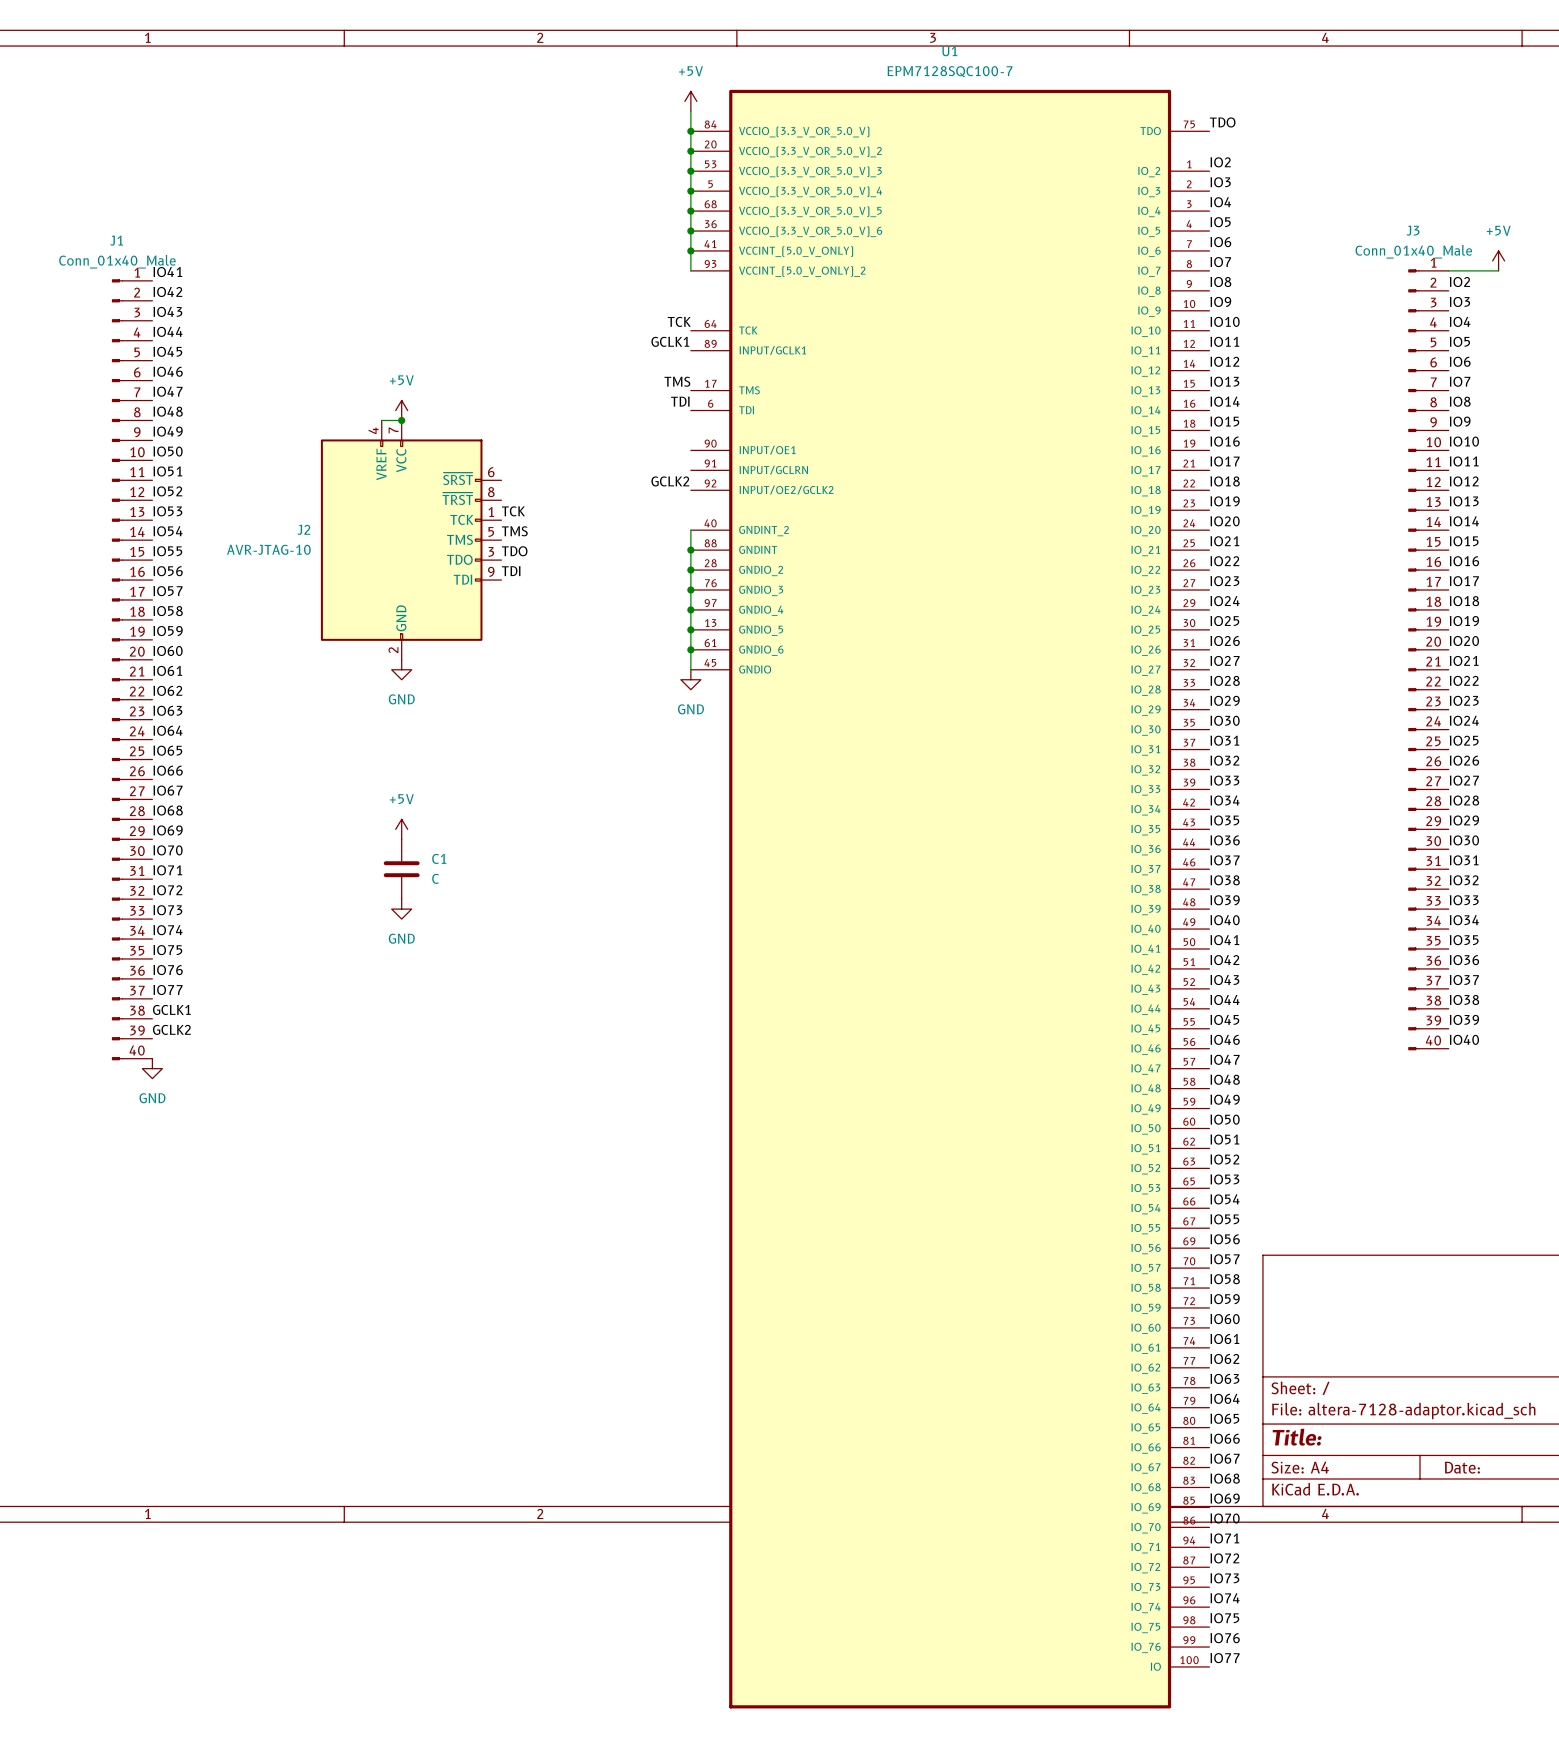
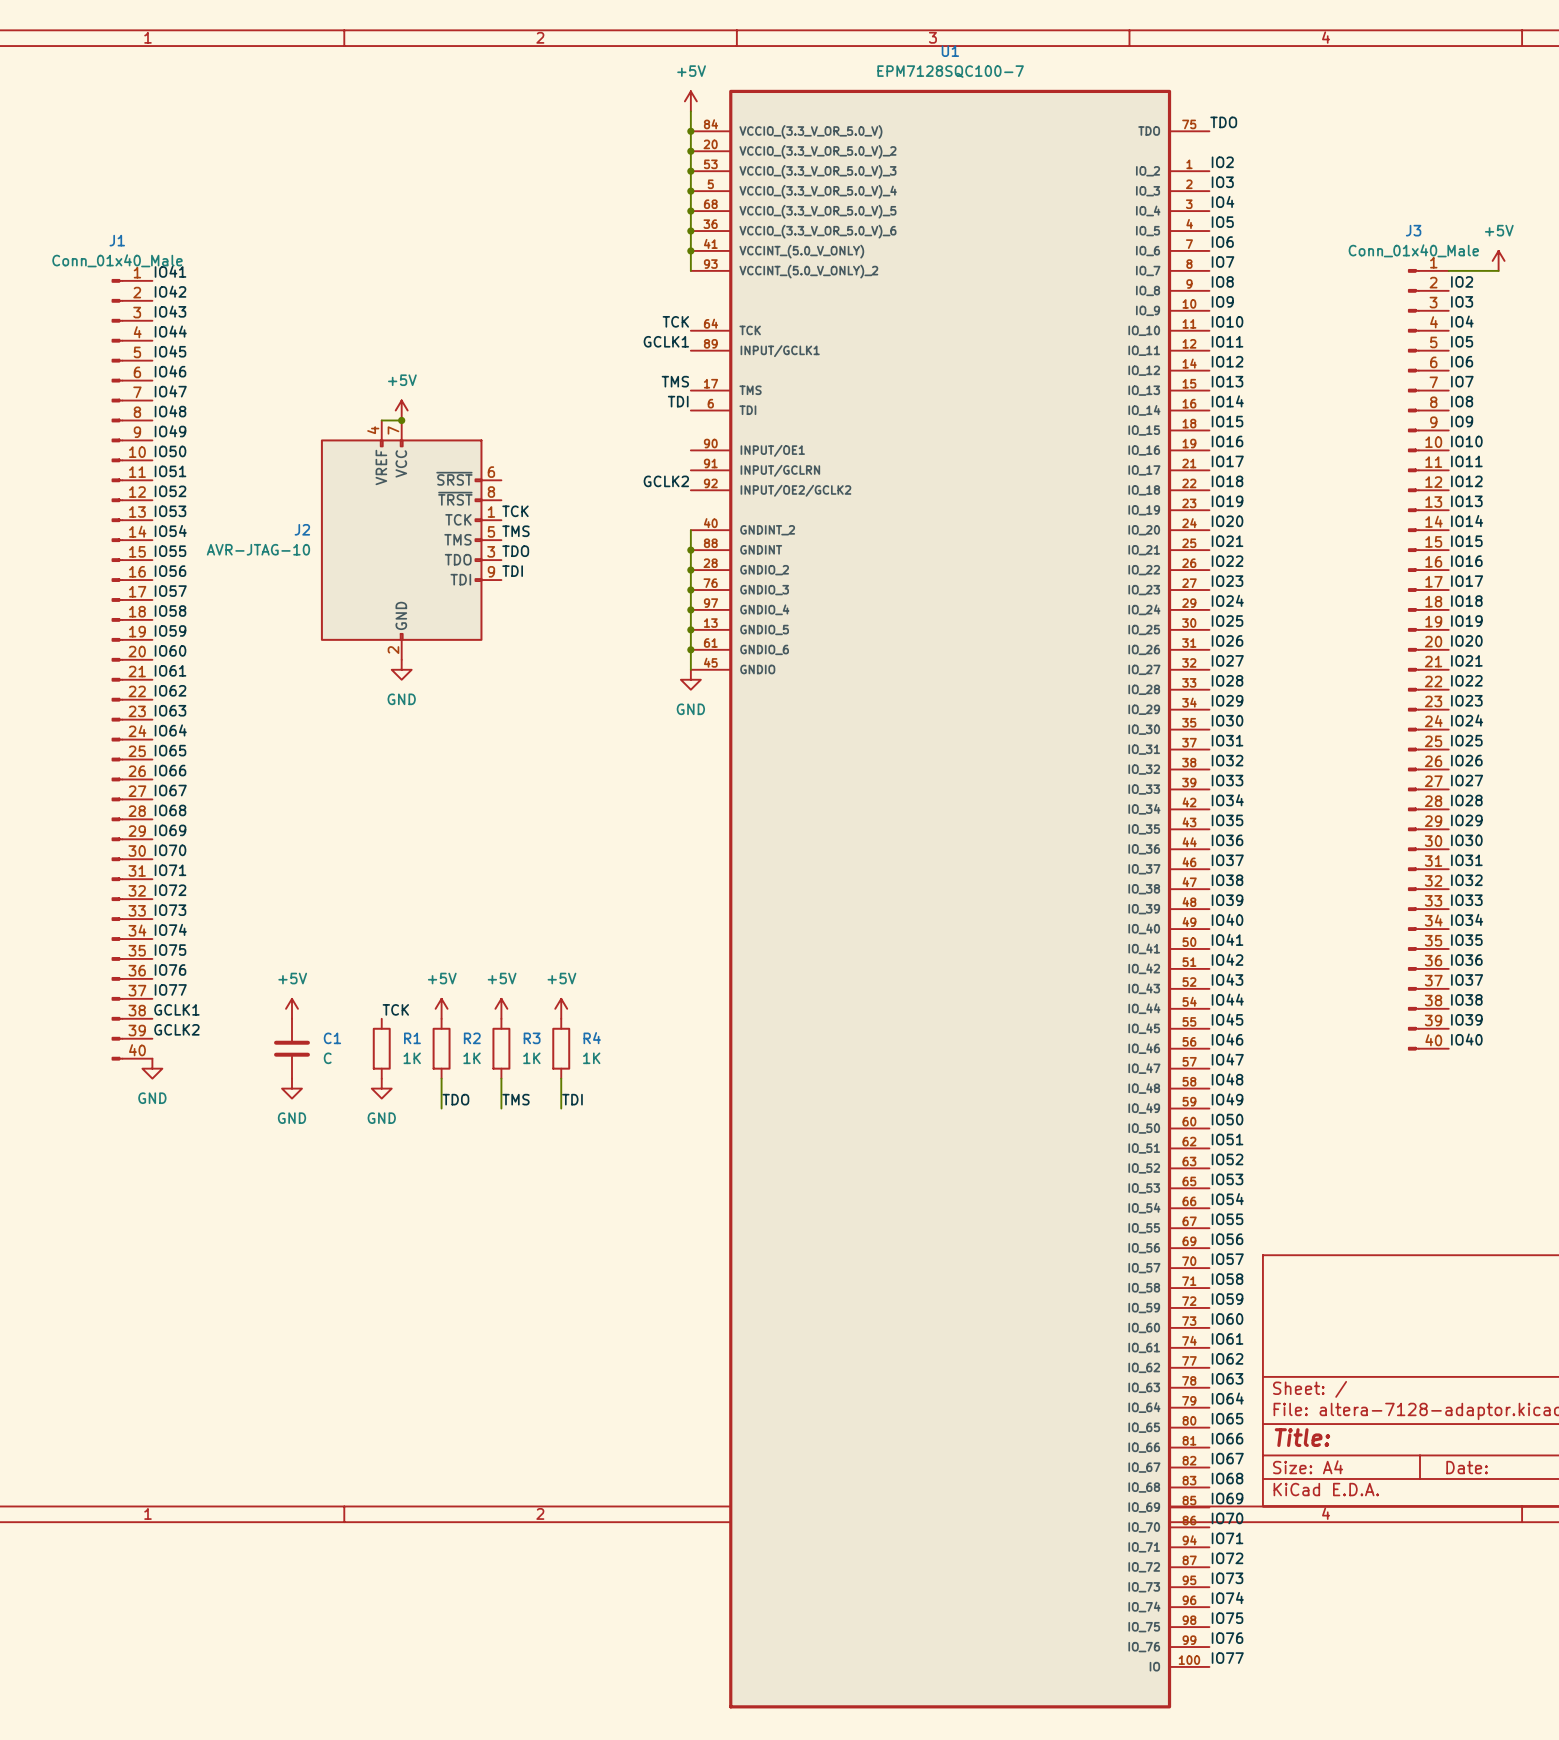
power symbol: +5V (401, 829) -> none
C1 position: (401, 869) -> (291, 1048)
power symbol: GND (401, 909) -> none
power symbol: none -> +5V (291, 1008)
power symbol: none -> +5V (441, 1008)
power symbol: none -> +5V (501, 1008)
power symbol: none -> +5V (561, 1008)
label: none -> TCK (395, 1009)
R1: none -> 1K (381, 1048)
R2: none -> 1K (441, 1048)
R3: none -> 1K (501, 1048)
R4: none -> 1K (561, 1048)
wire: none -> (441, 1078) (441, 1108)
wire: none -> (501, 1078) (501, 1108)
wire: none -> (561, 1078) (561, 1108)
power symbol: none -> GND (291, 1088)
power symbol: none -> GND (381, 1088)
label: none -> TDO (455, 1099)
label: none -> TMS (515, 1099)
label: none -> TDI (572, 1099)

